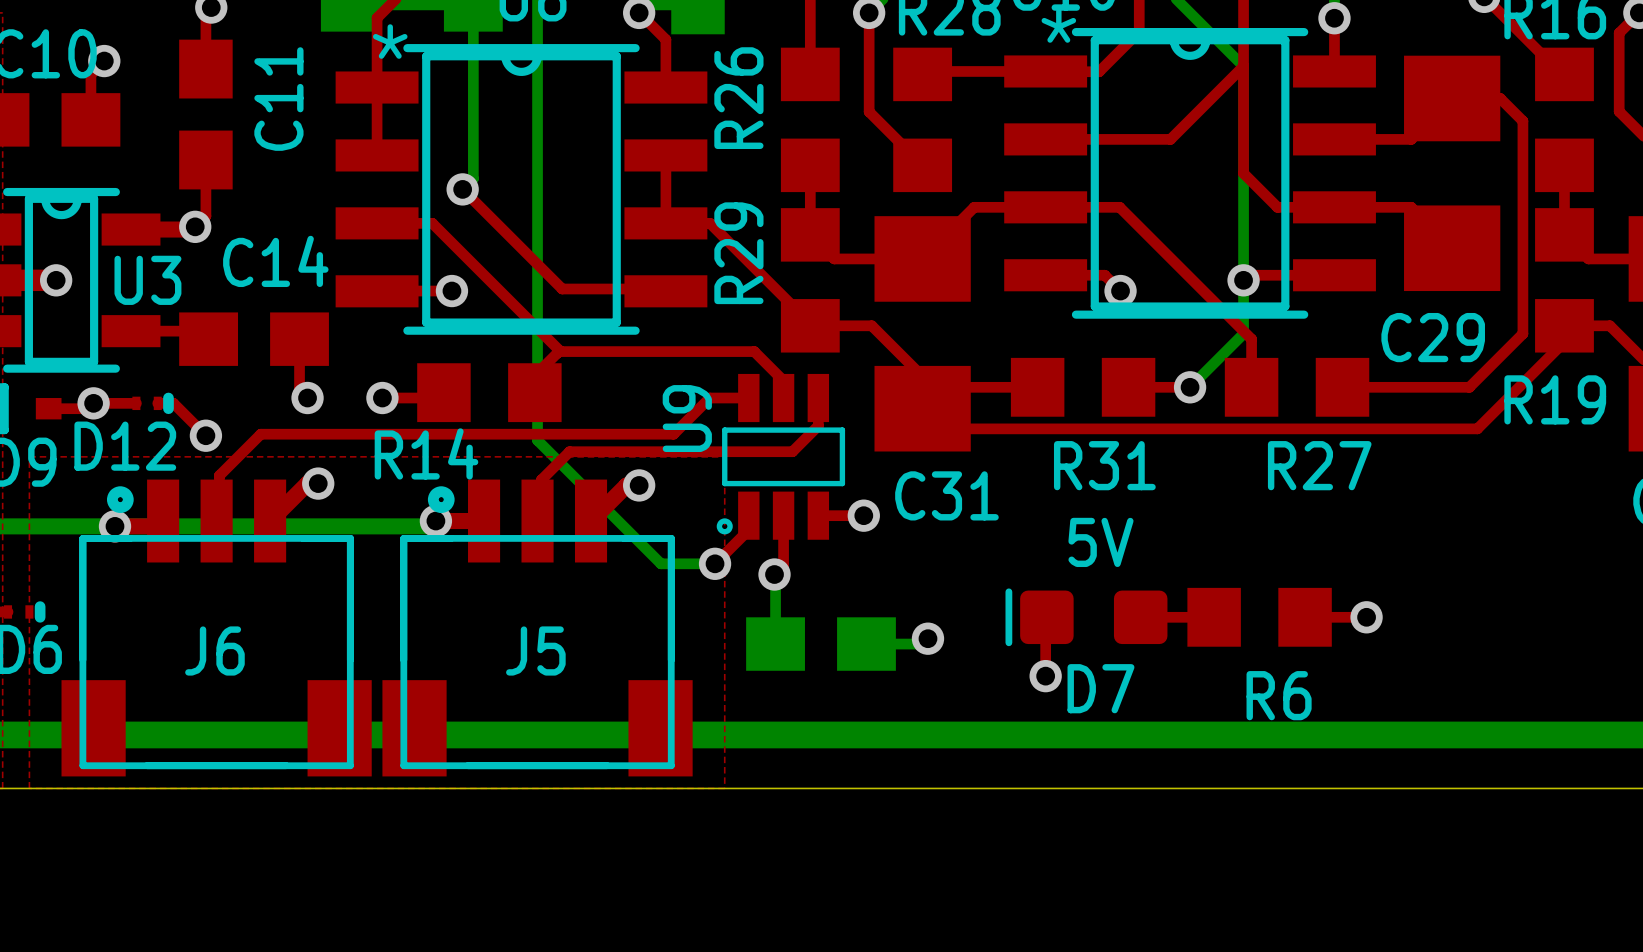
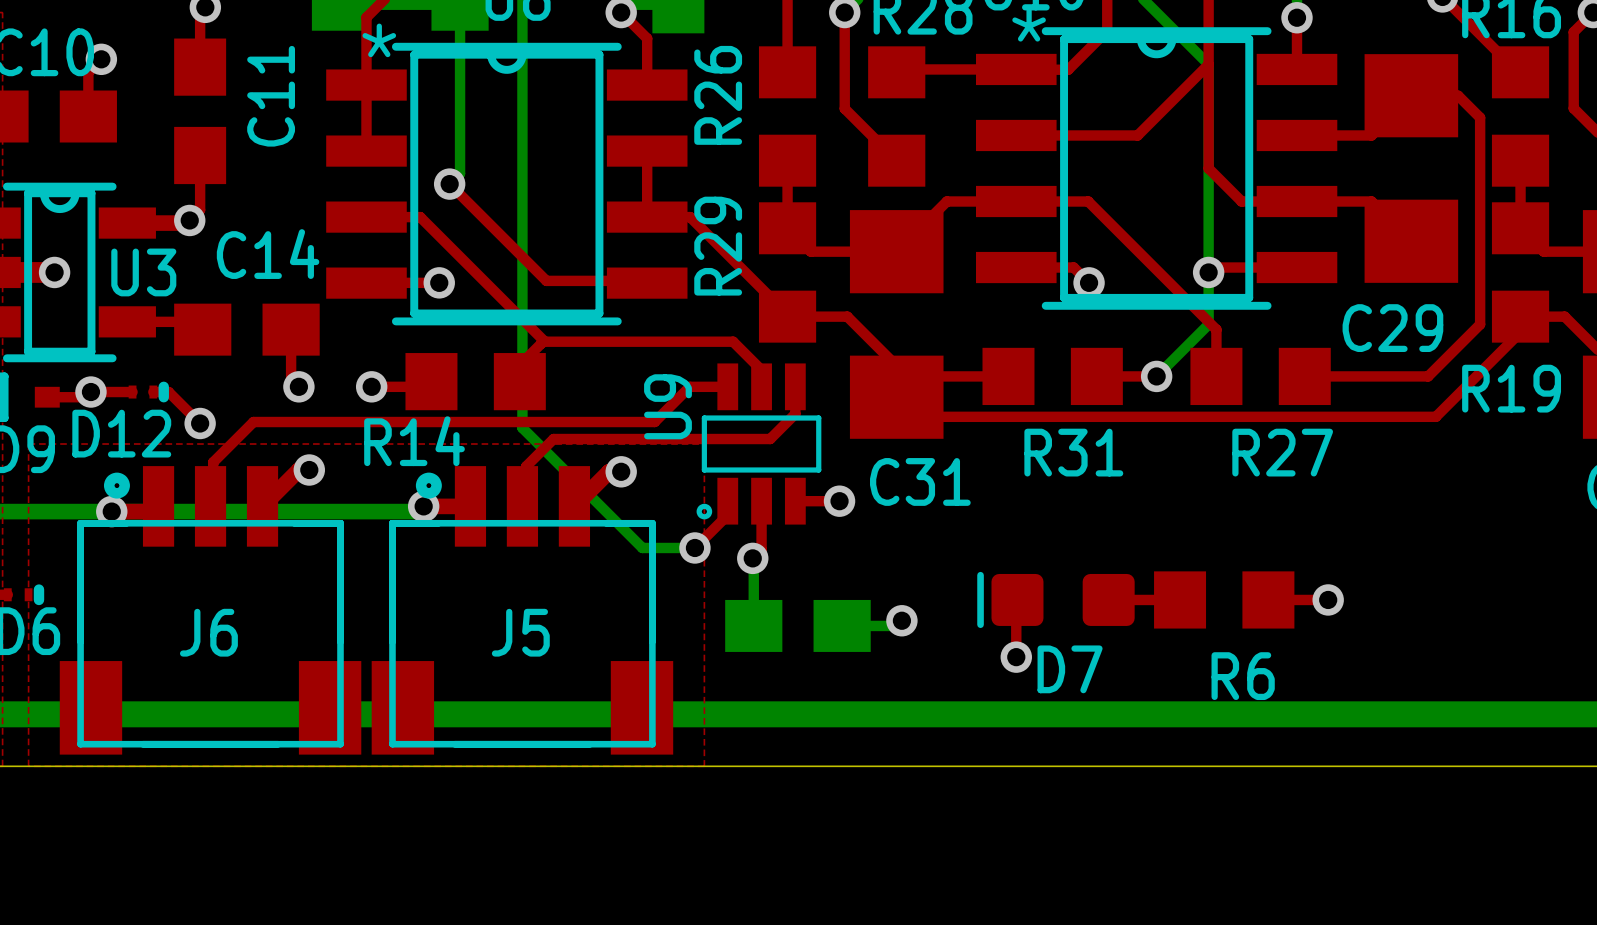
text: 5V (1100, 542) -> none

